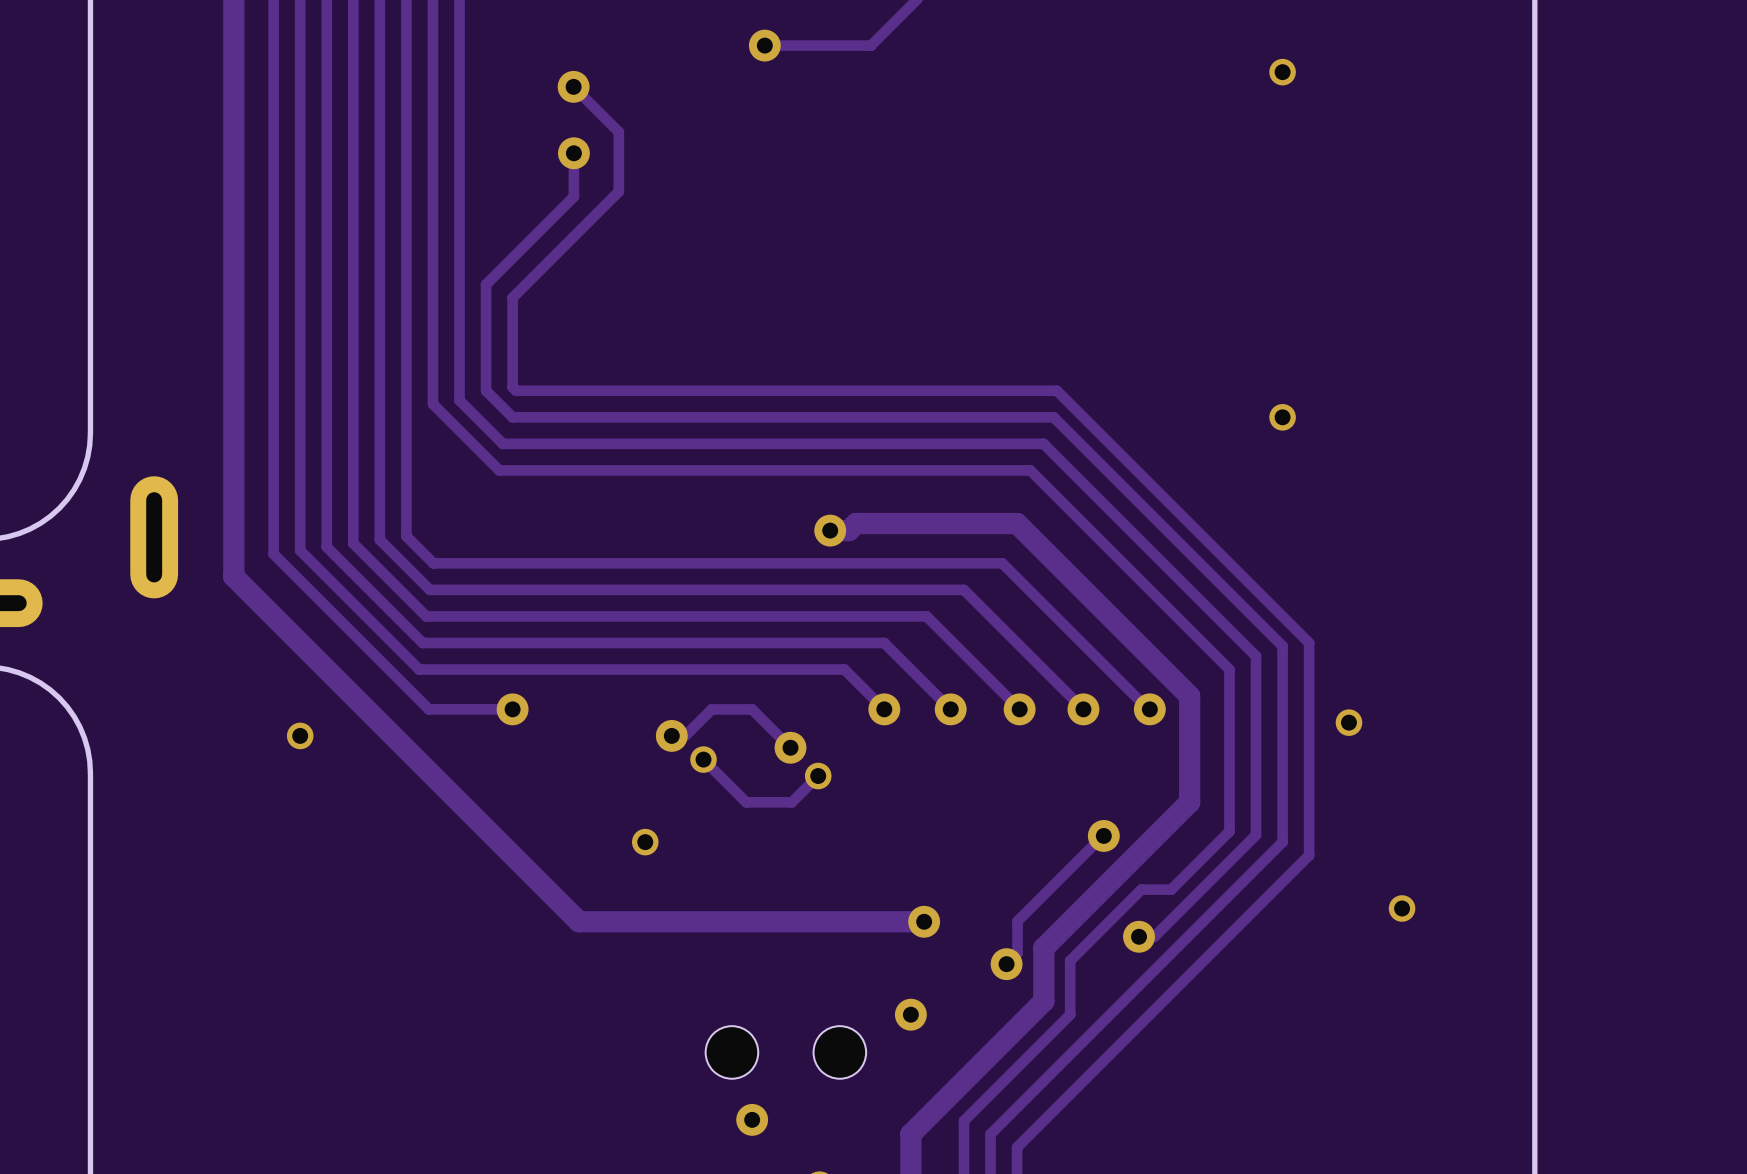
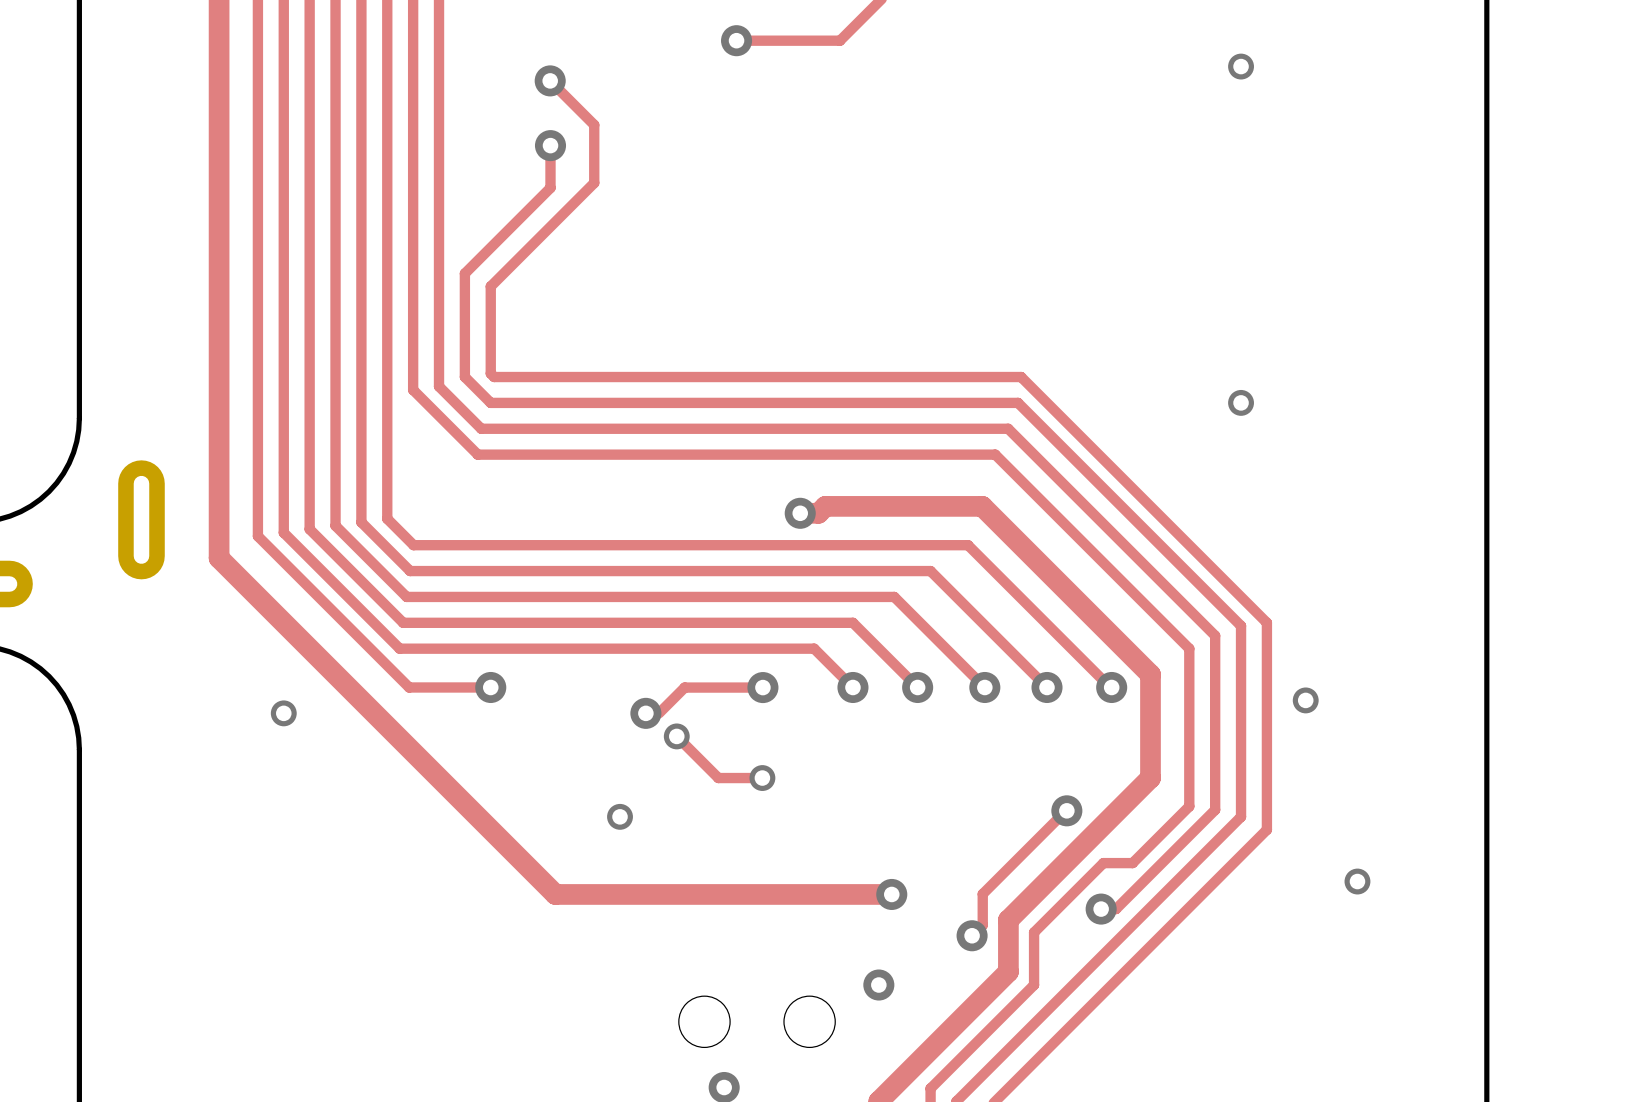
track: (752, 709) (790, 747) -> (724, 687) (762, 687)
via position: (790, 747) -> (762, 687)
track: (818, 776) (791, 802) -> none
via position: (818, 776) -> (762, 778)

